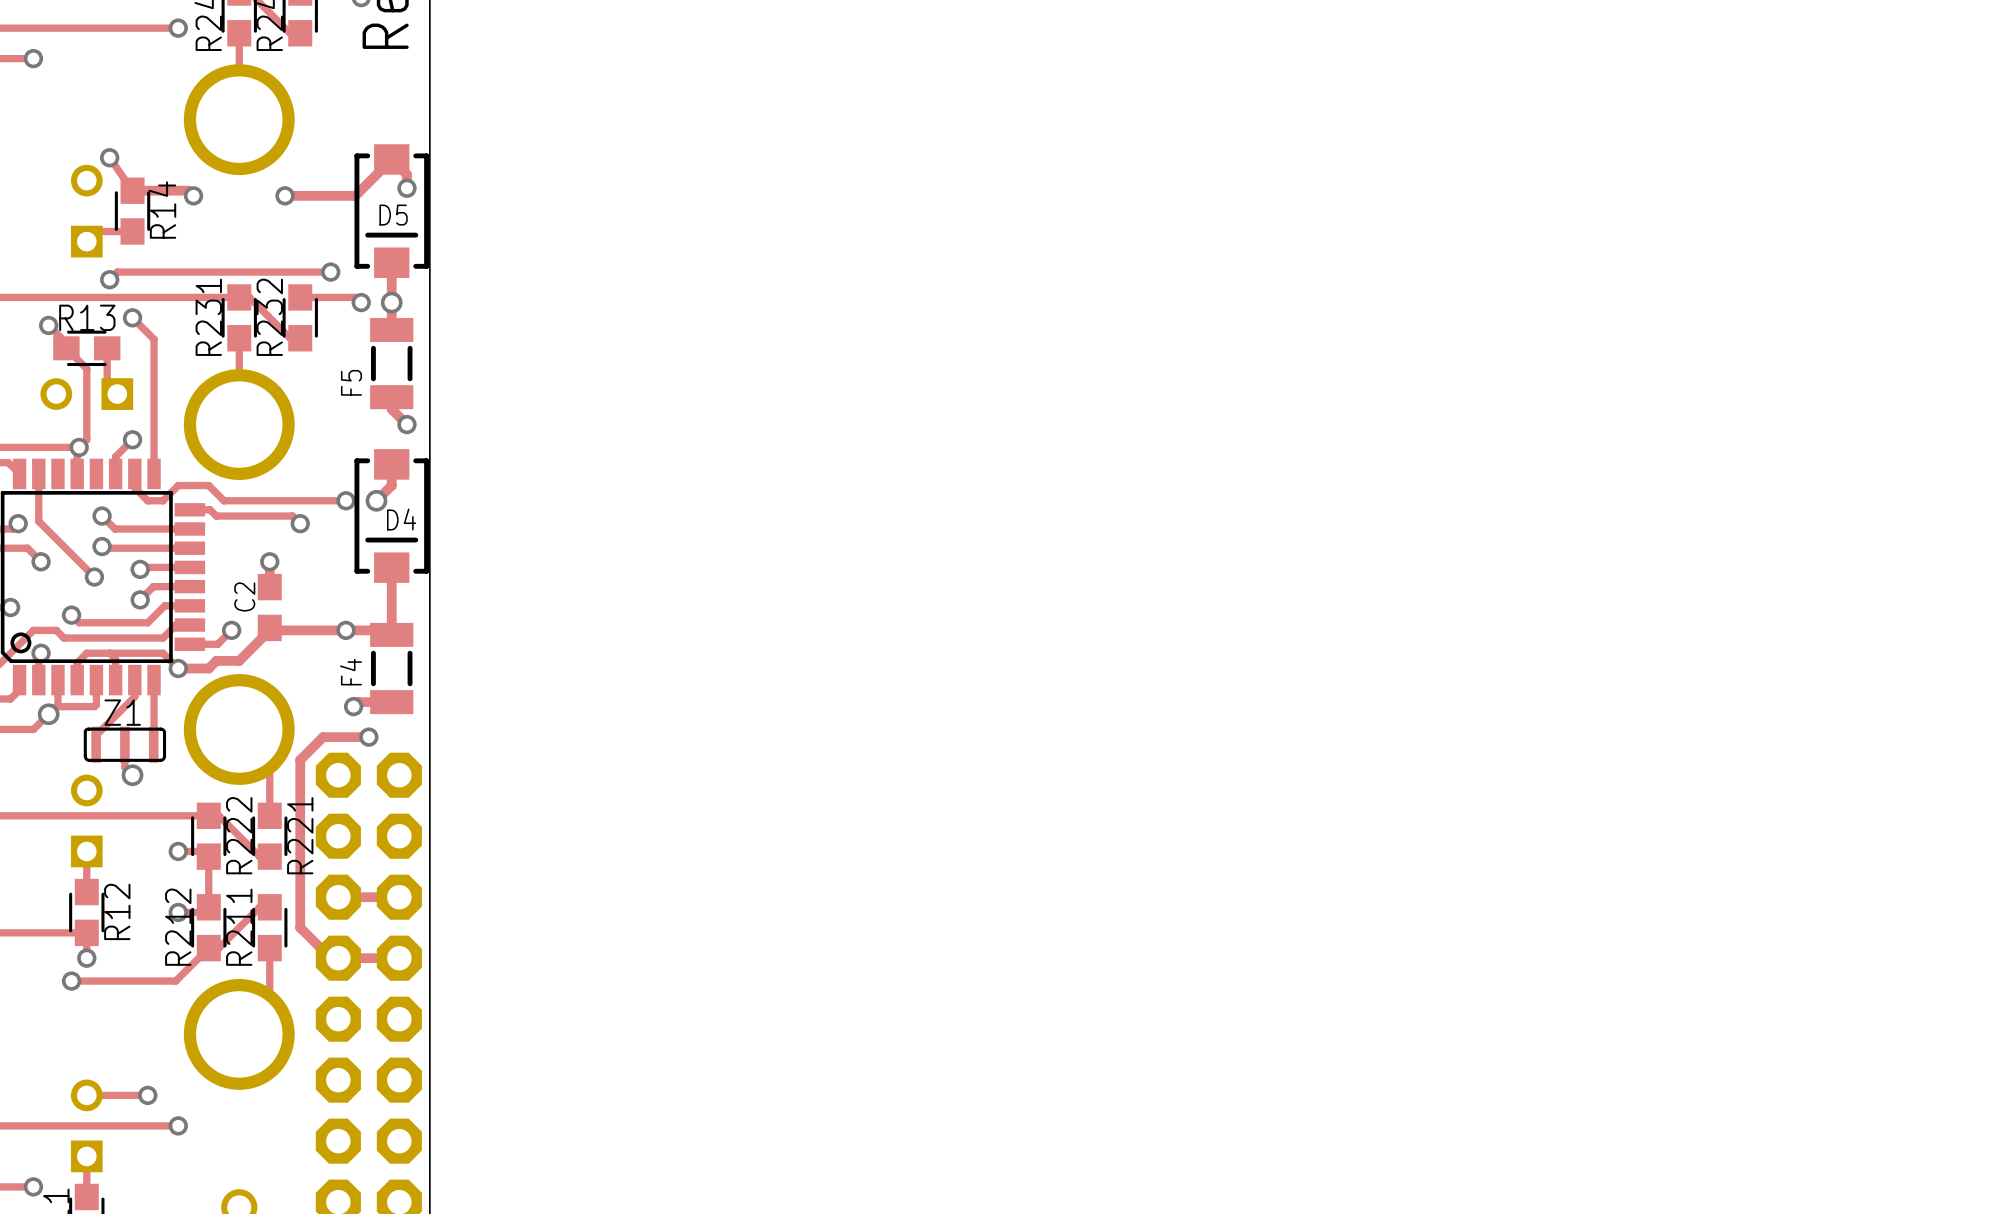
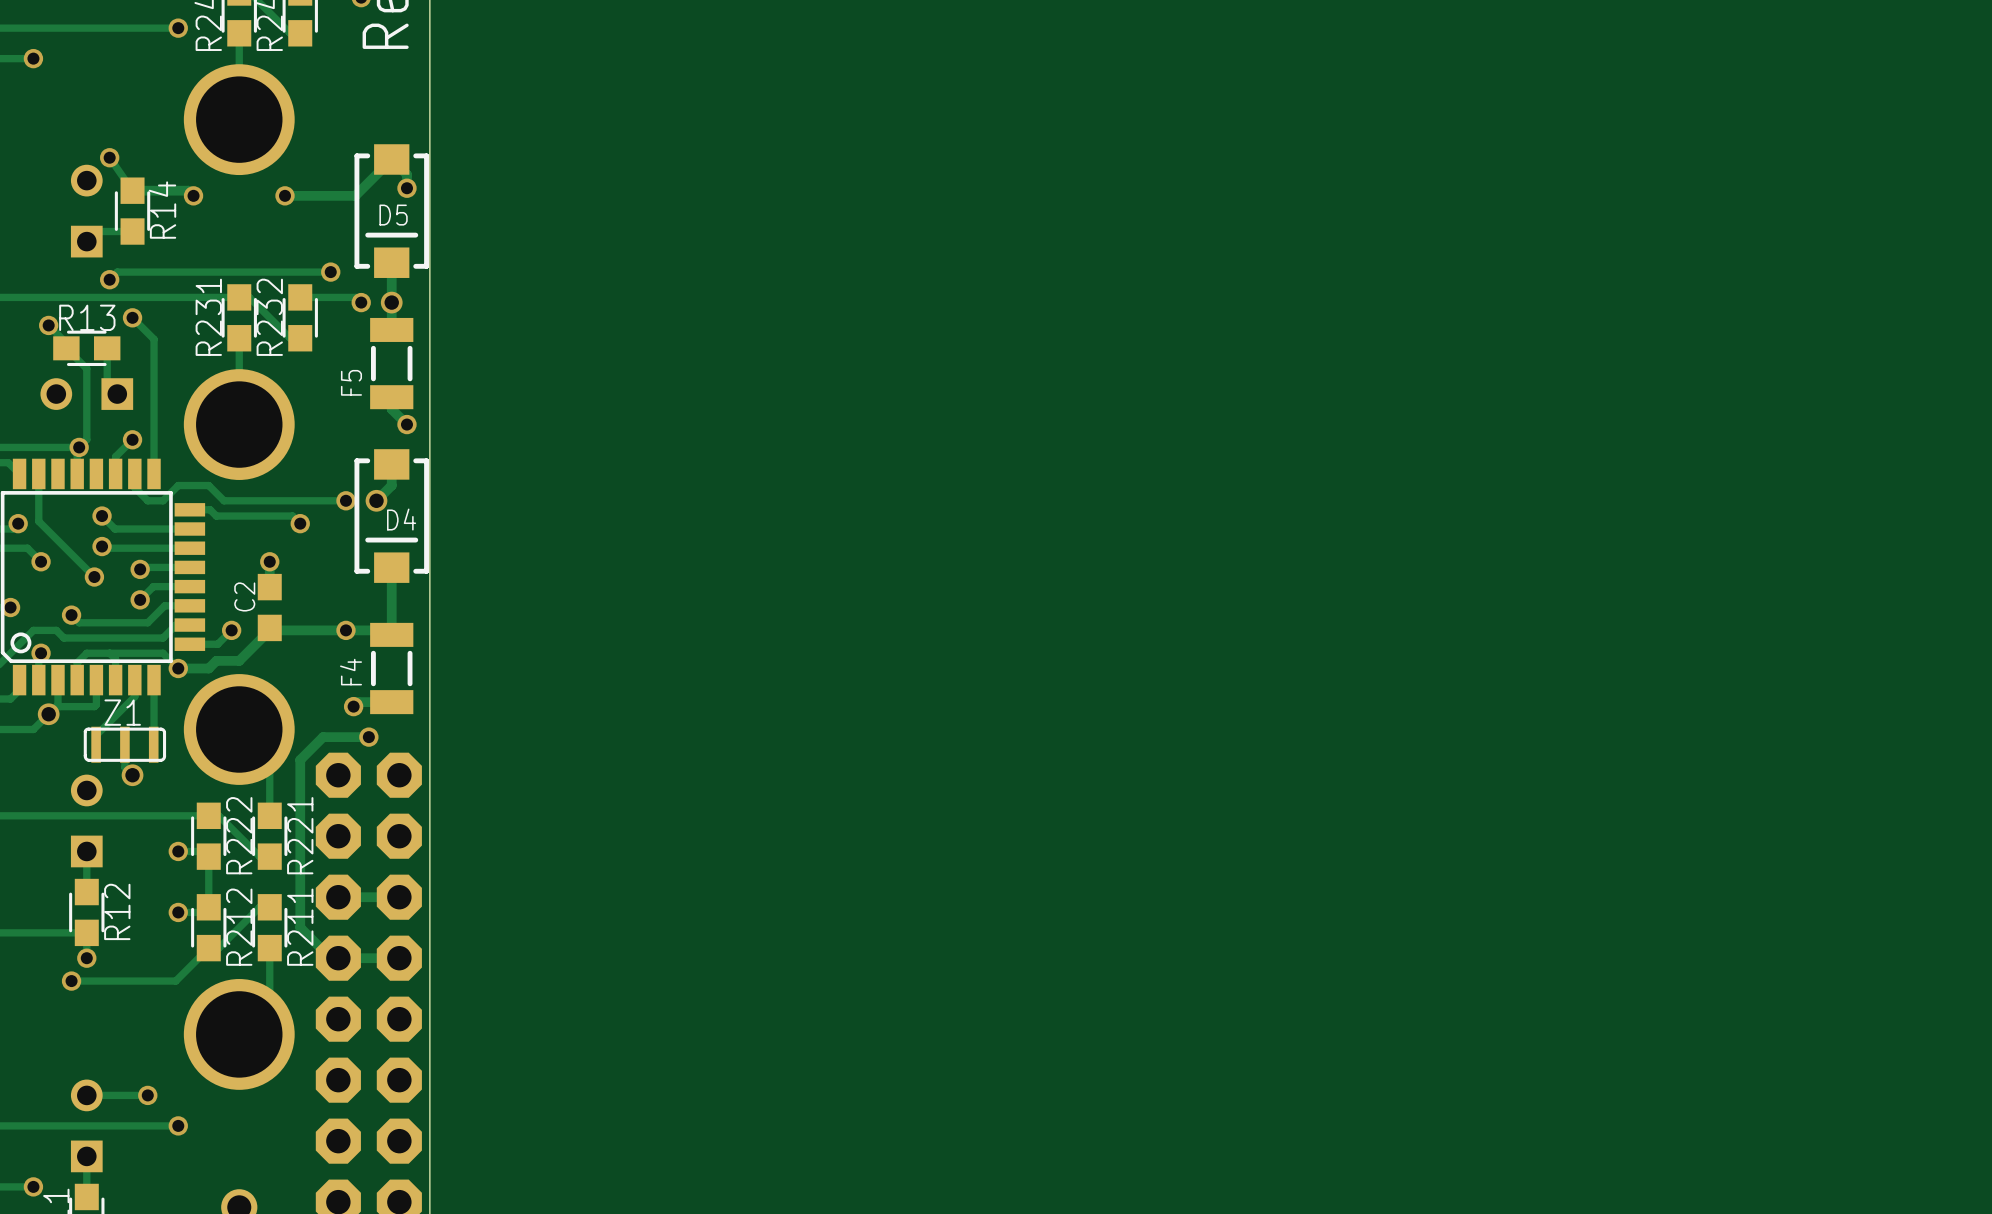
R212 name position: R212 (178, 927) -> R212 (239, 927)
R211 name position: R211 (239, 927) -> R211 (300, 927)

